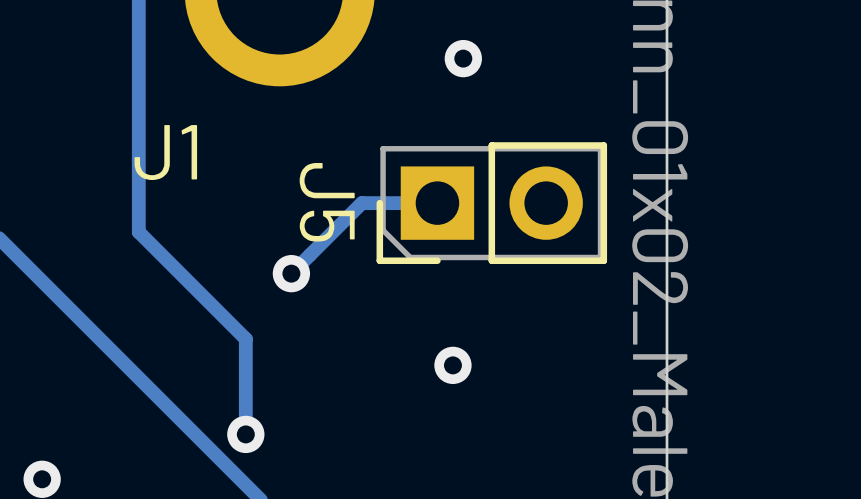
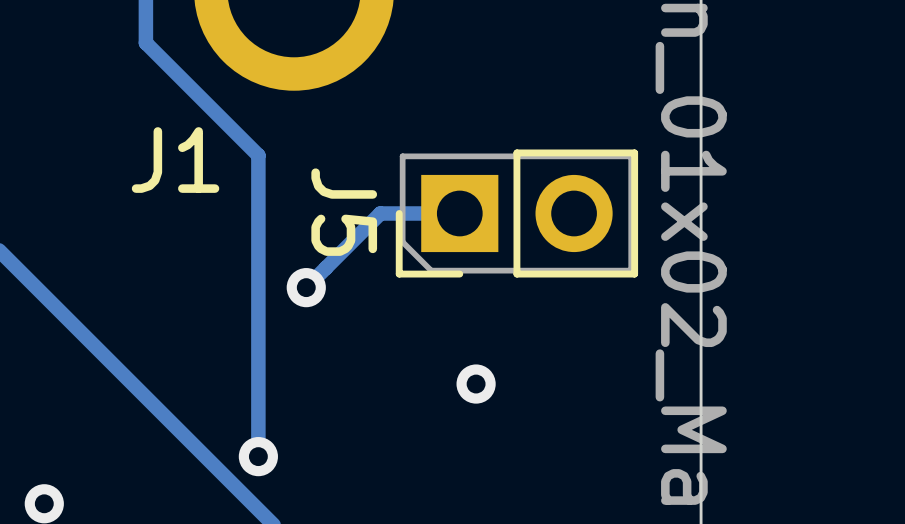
track: (138, 40) (138, 232) (245, 339) -> (145, 42) (258, 155) (258, 356)
via: (463, 58) -> none

